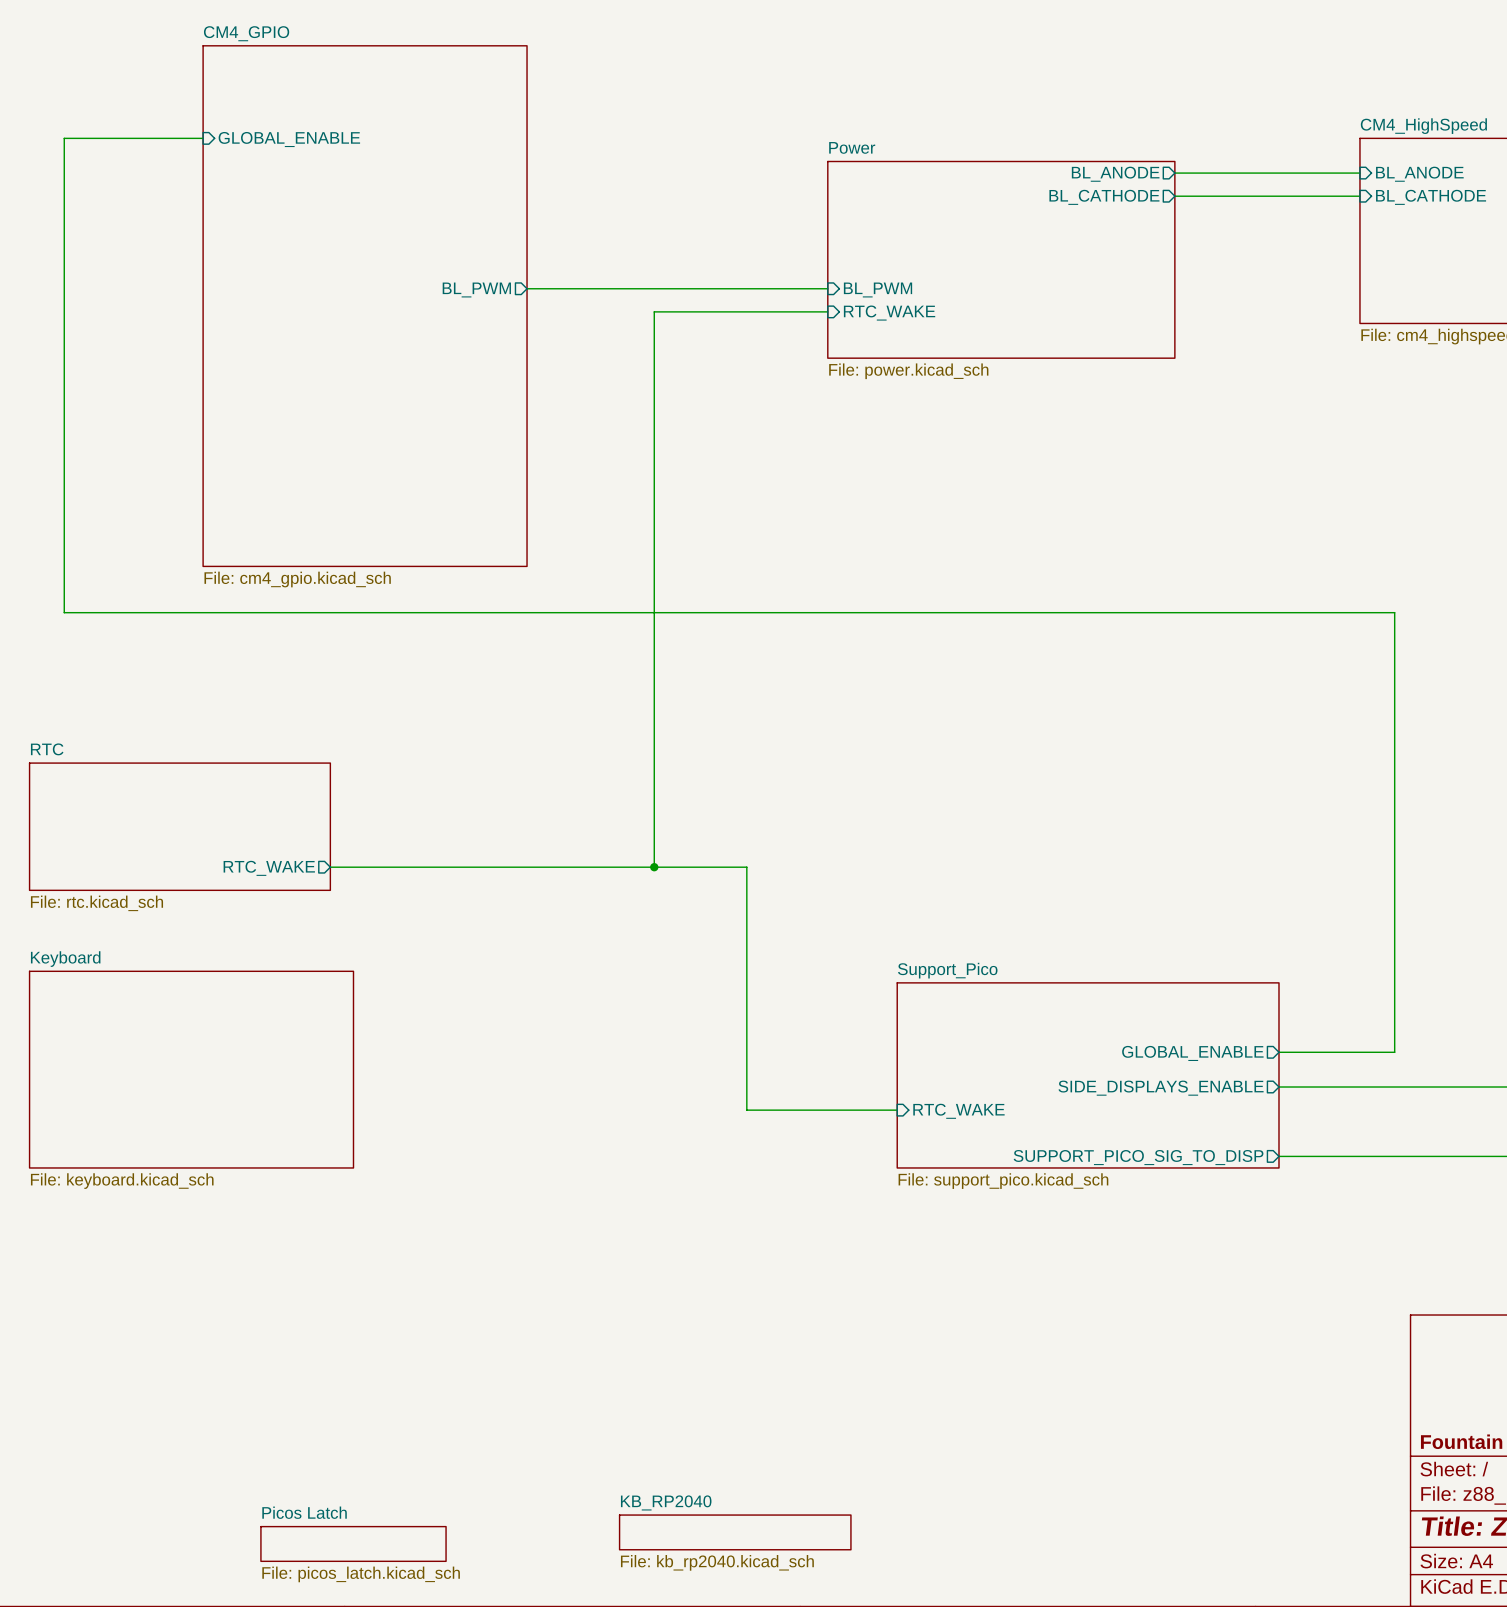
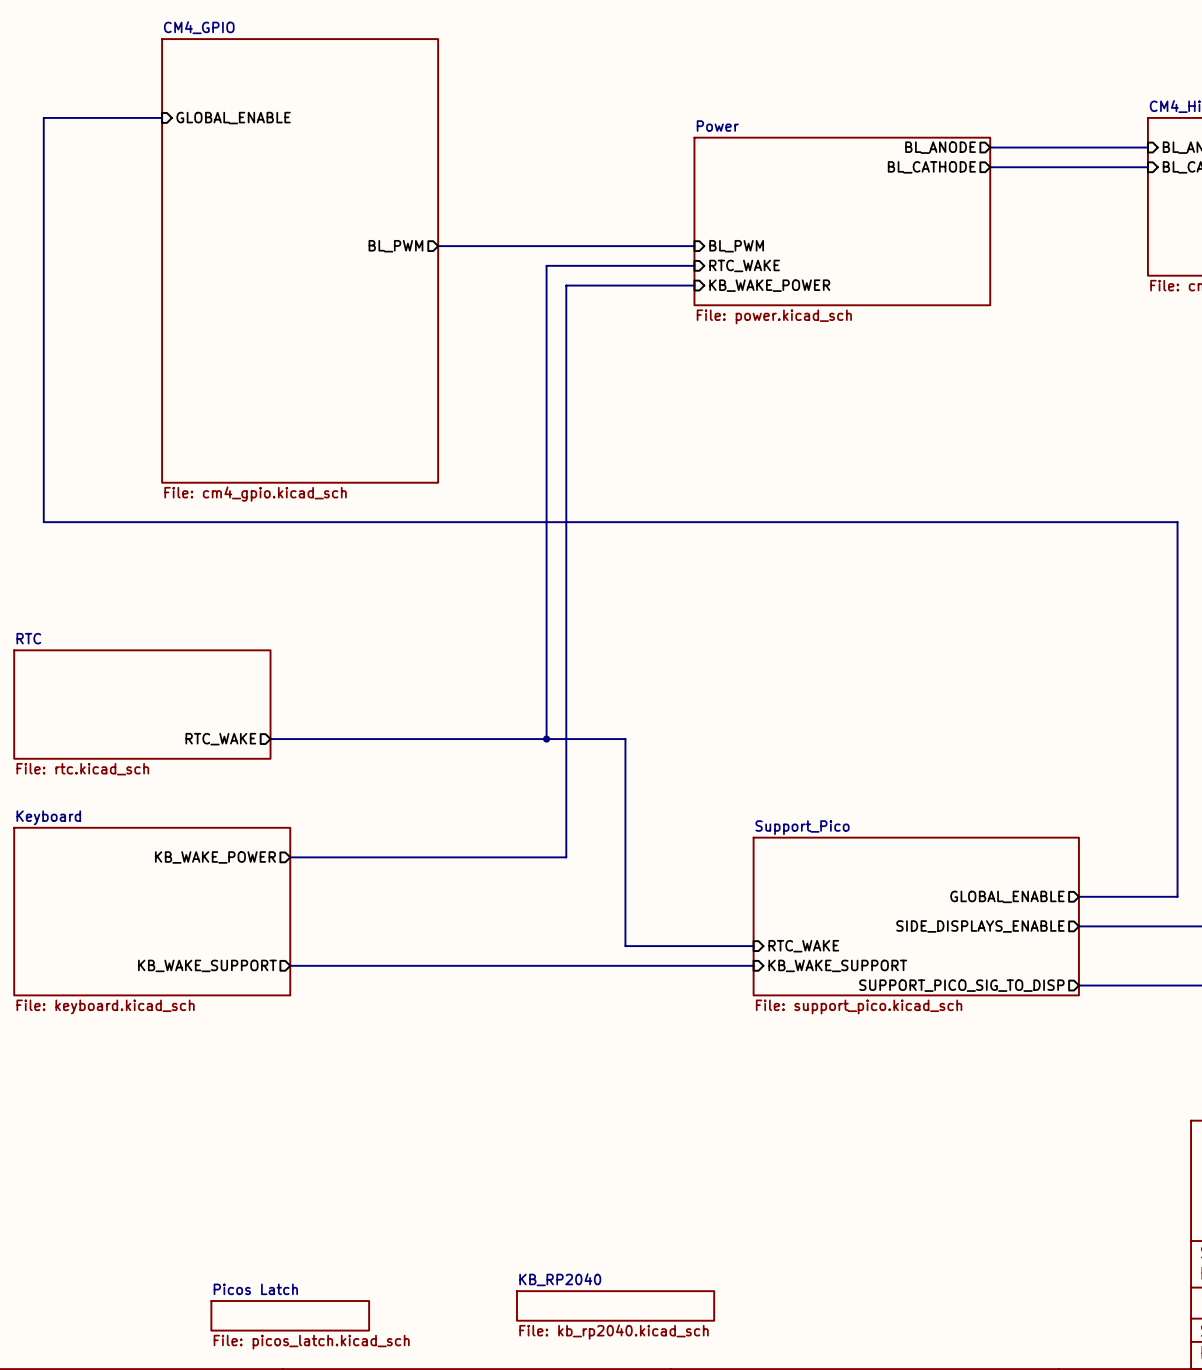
wire: none -> (694, 285) (566, 285) (566, 857) (290, 857)
sheet pin: none -> KB_WAKE_POWER (769, 285)
sheet pin: none -> KB_WAKE_POWER (215, 857)
wire: none -> (290, 965) (753, 965)
sheet pin: none -> KB_WAKE_SUPPORT (207, 965)
sheet pin: none -> KB_WAKE_SUPPORT (837, 965)

